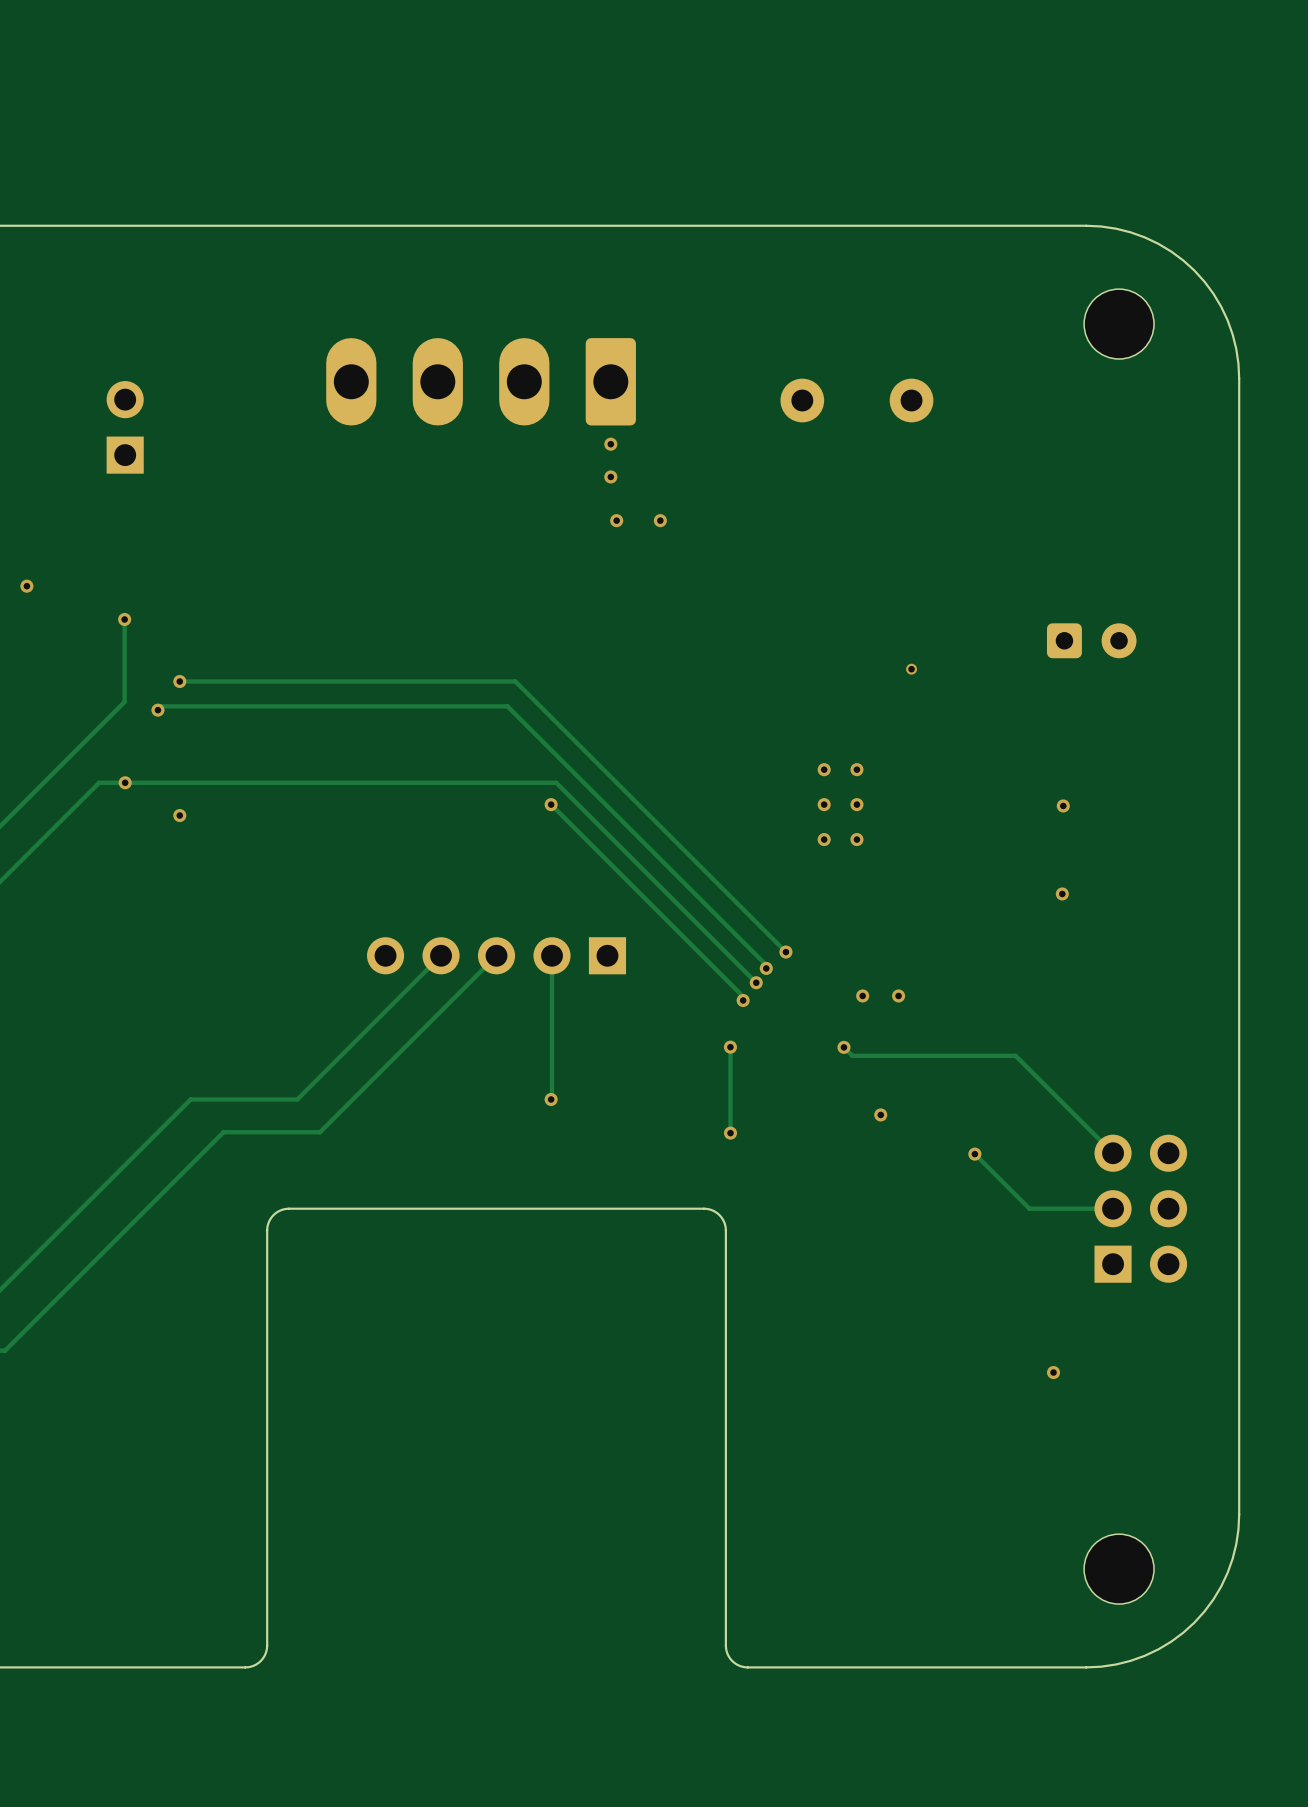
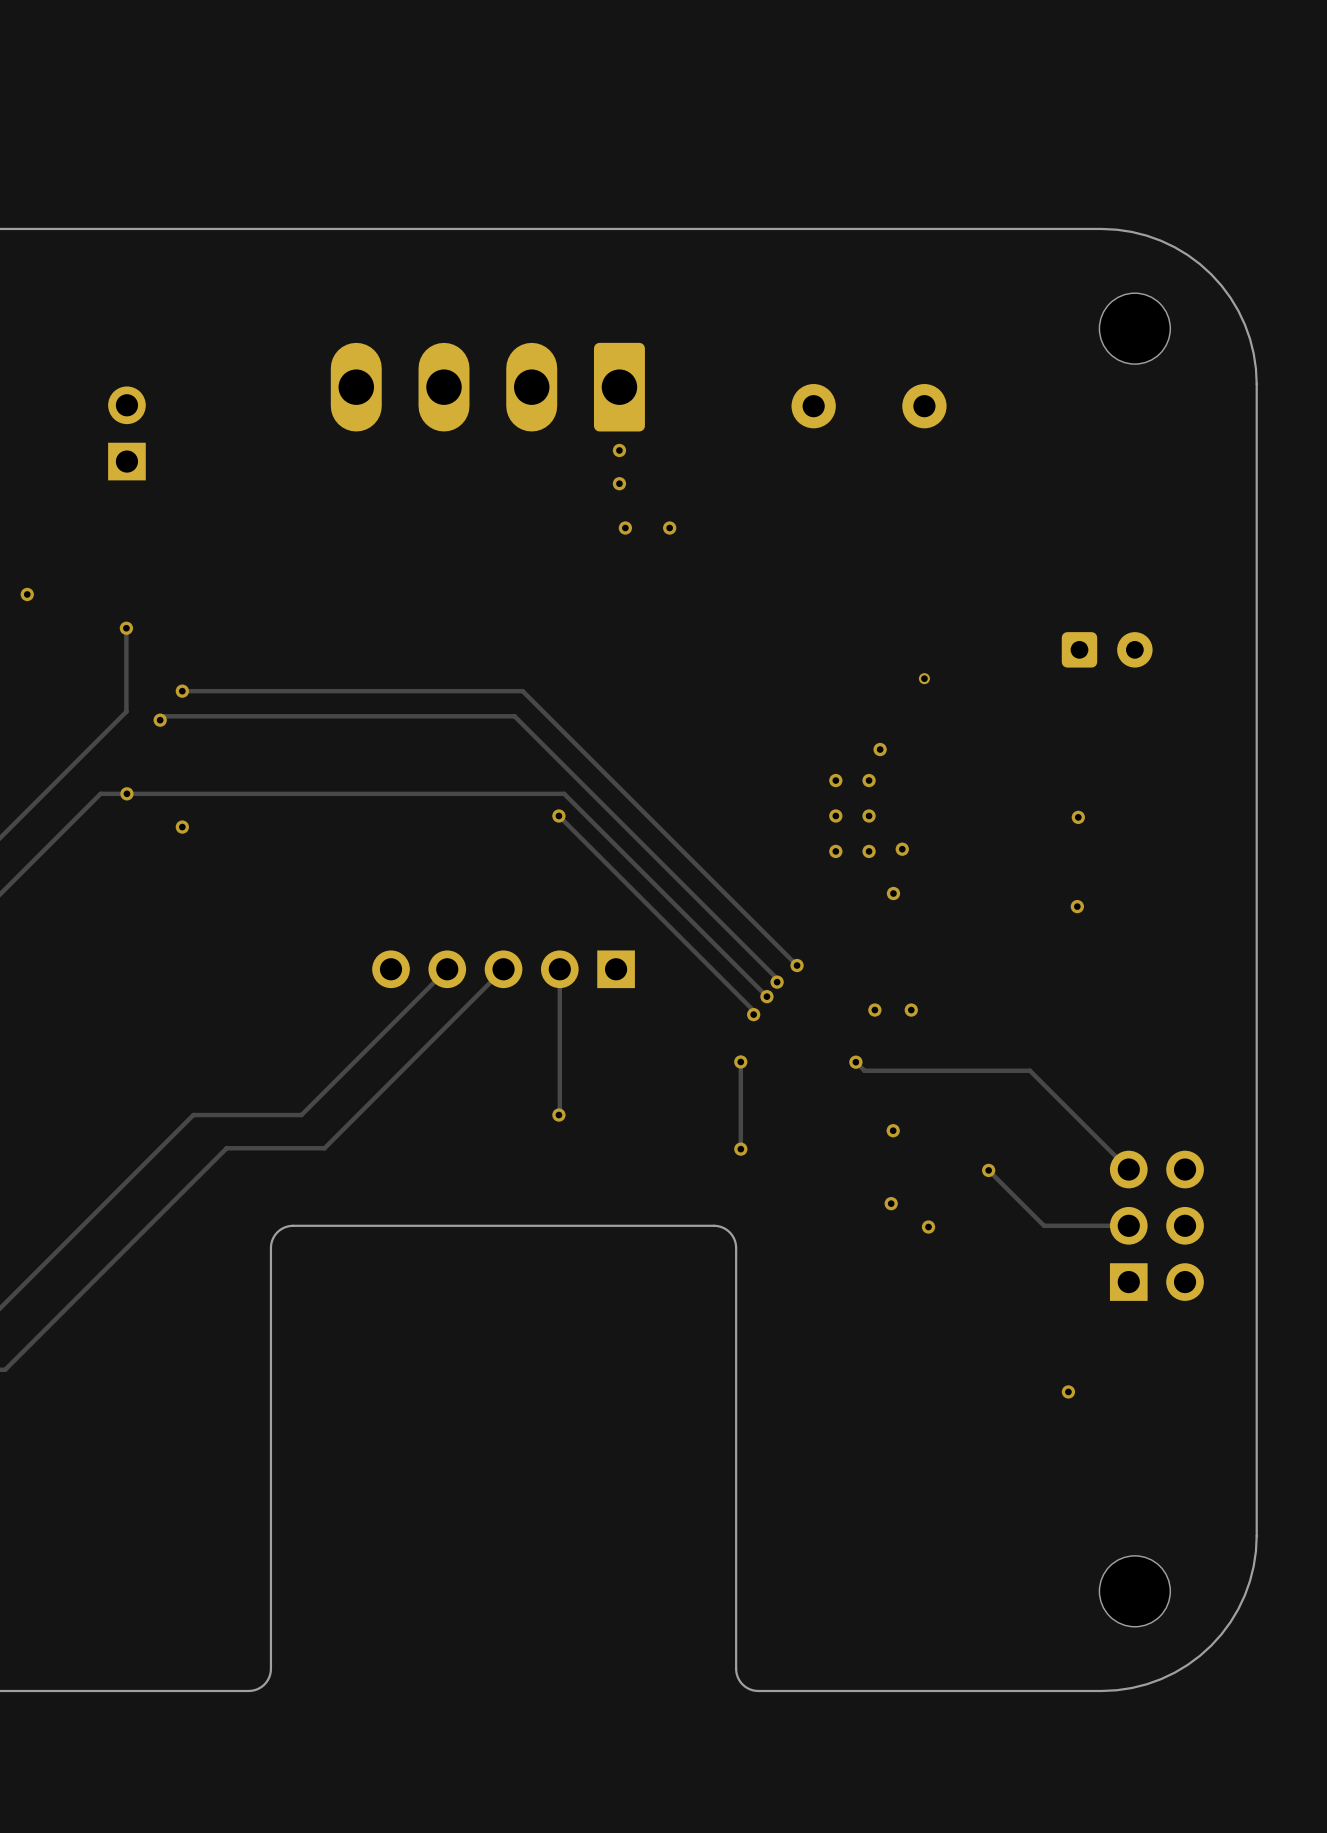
via: none -> (880, 749)
via: none -> (902, 849)
via: none -> (893, 893)
via: none -> (891, 1203)
via: none -> (928, 1227)

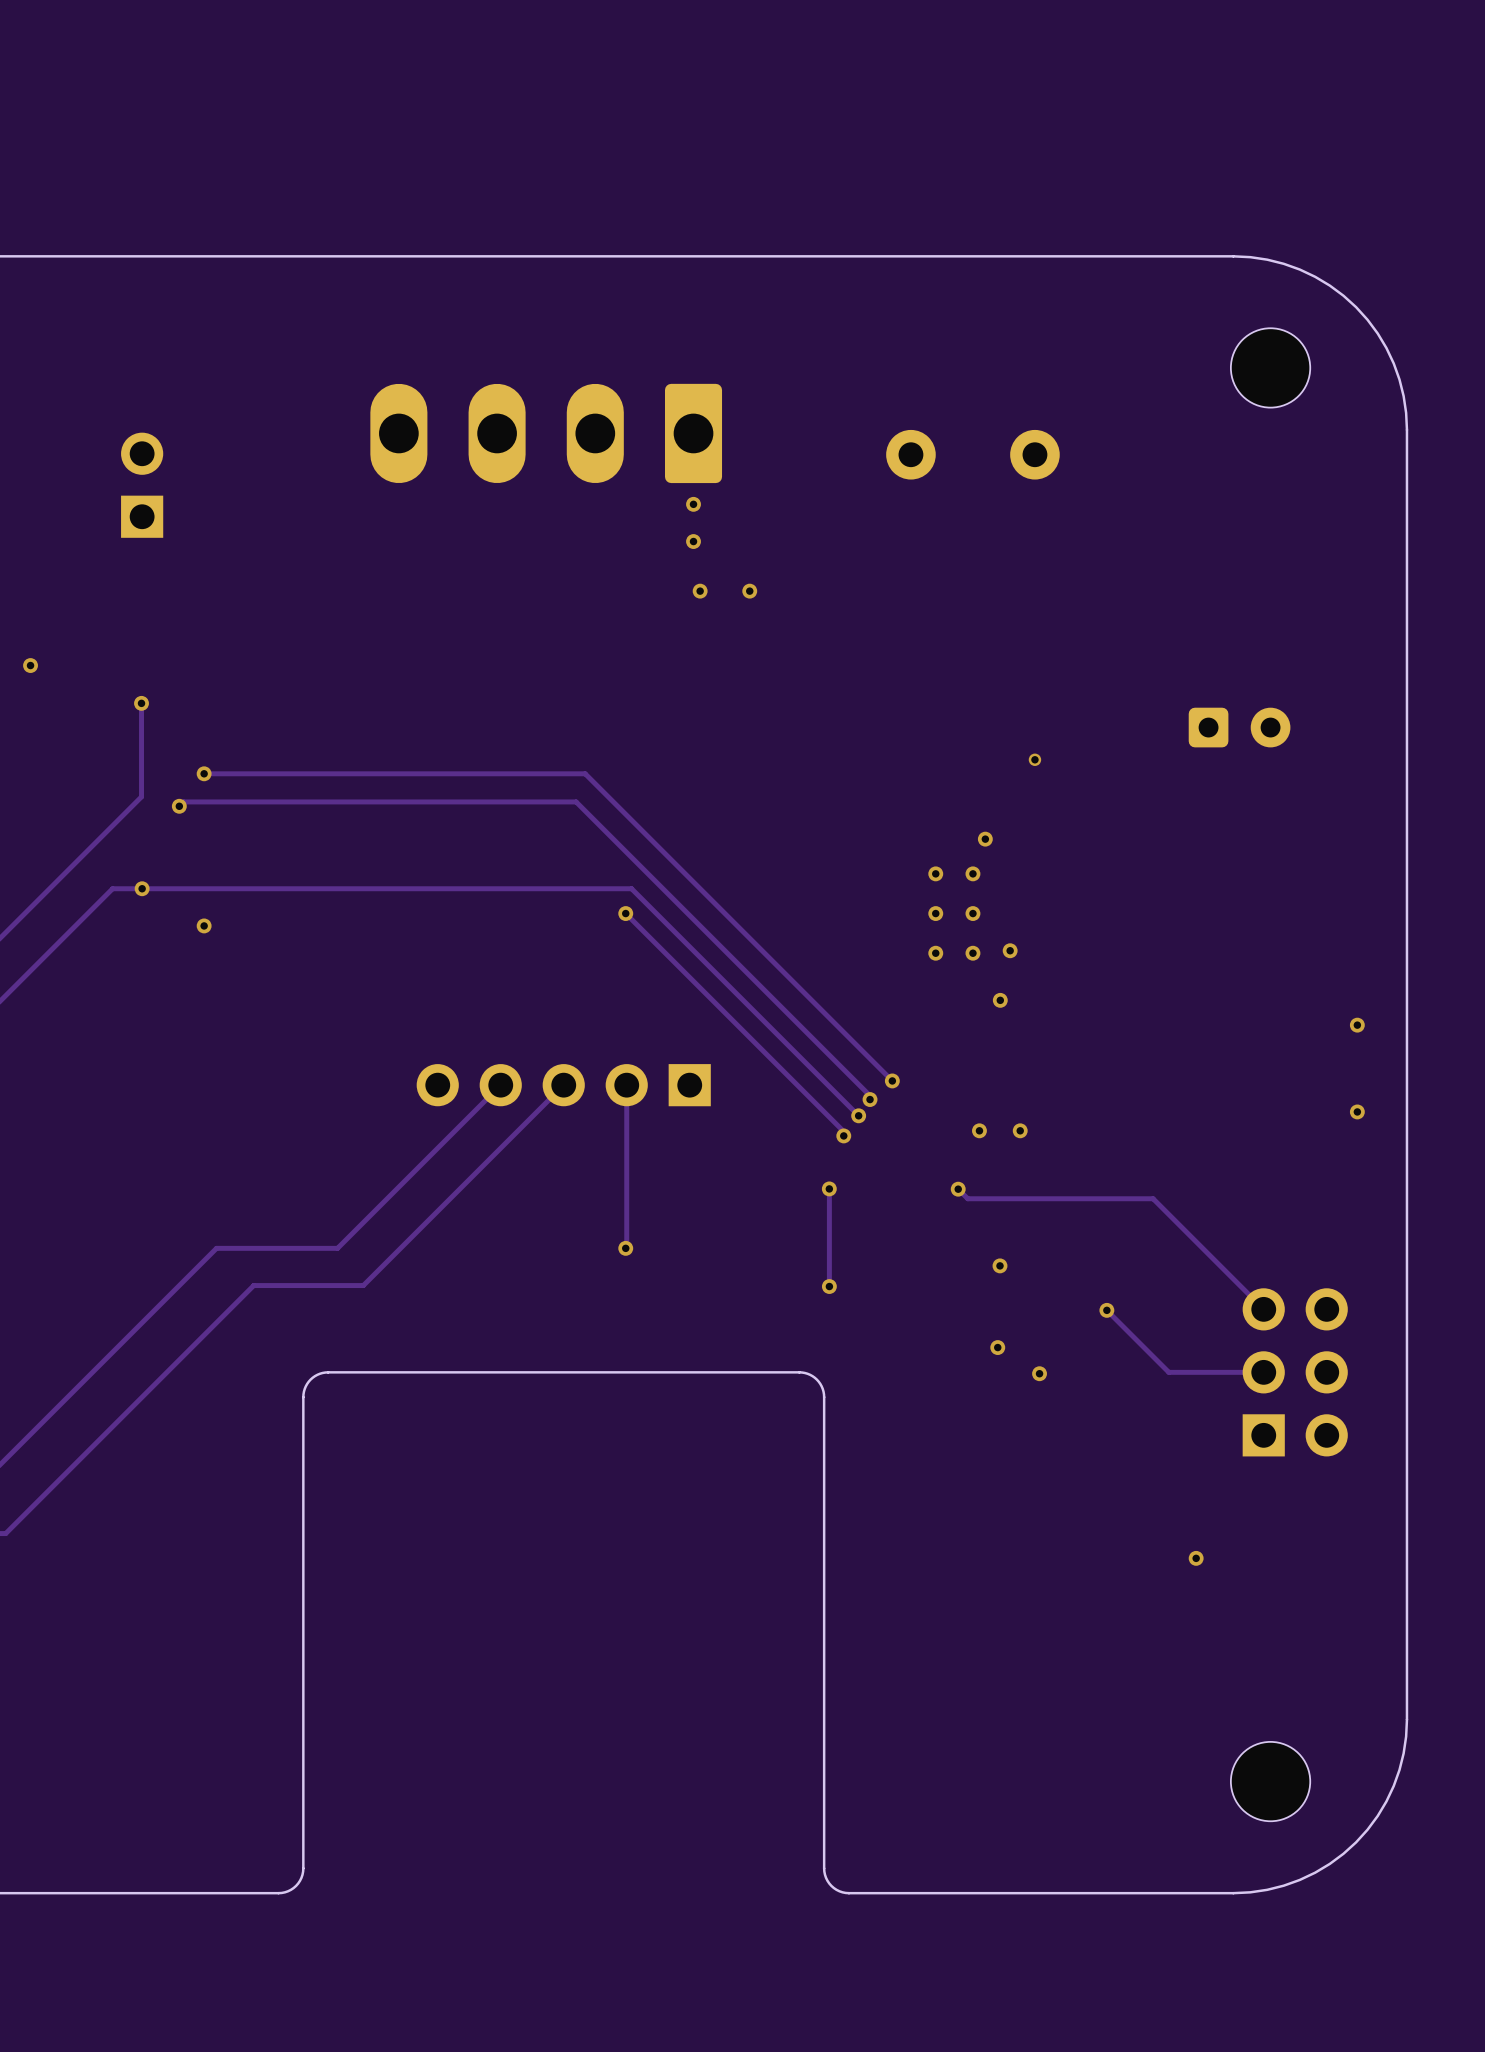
via: (1078, 817) -> none
via: (1077, 906) -> none
via: none -> (1357, 1025)
via: none -> (1357, 1111)

